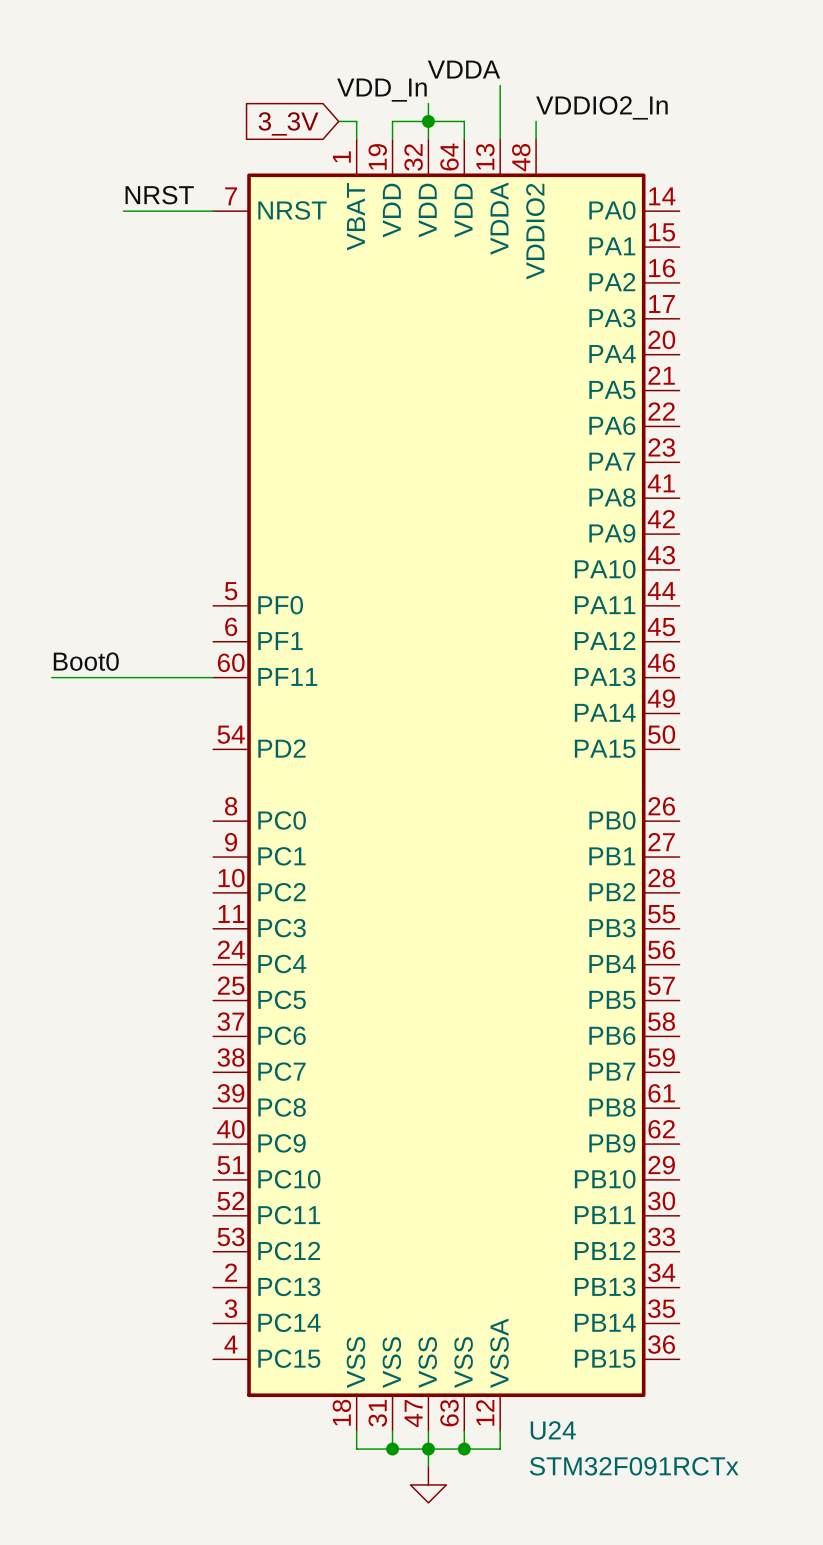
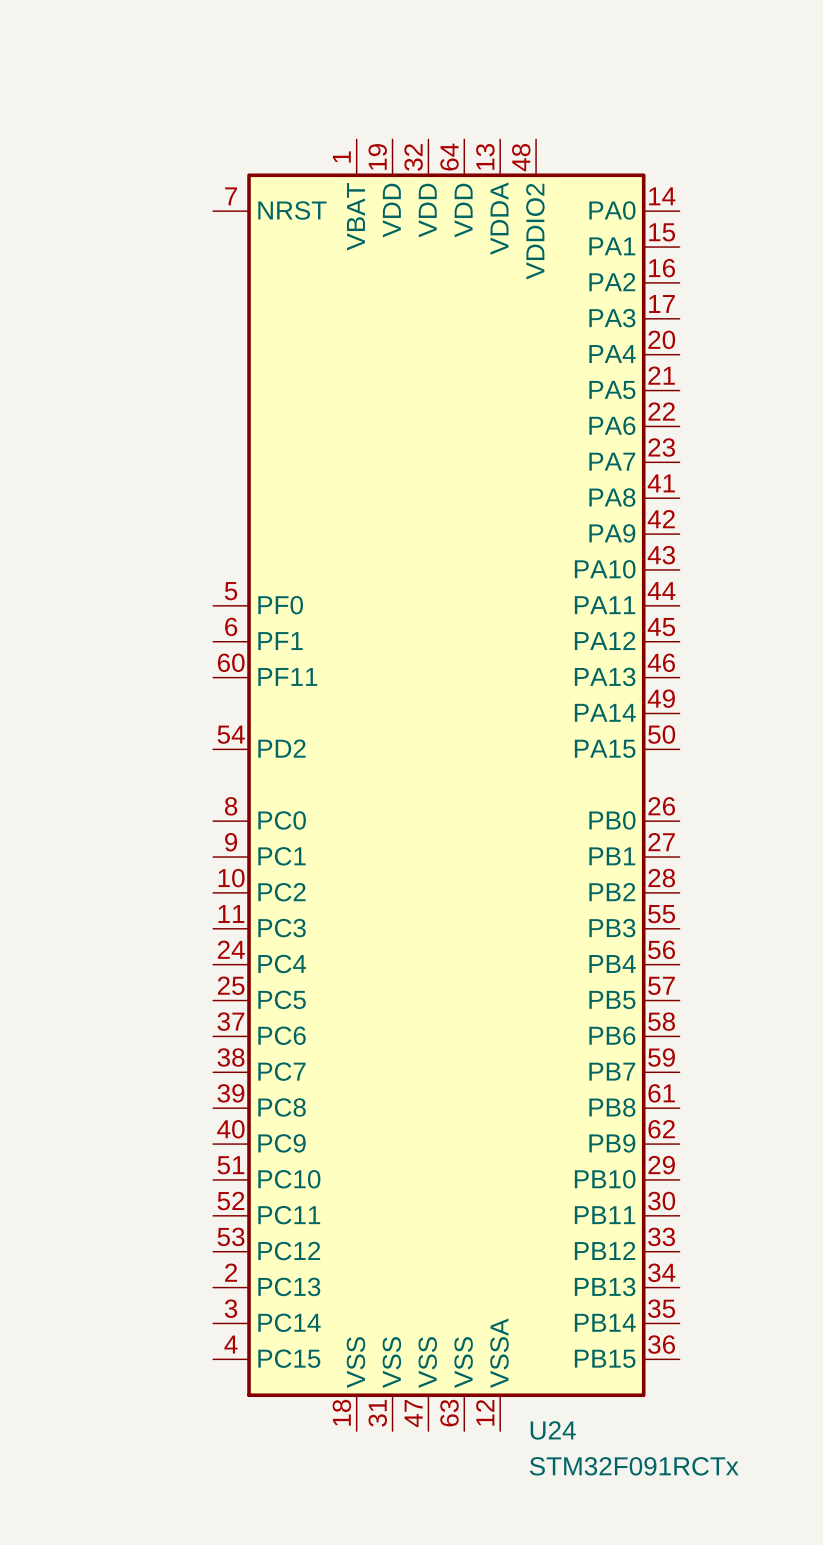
label: VDDA (463, 69) -> none
wire: (500, 85) (500, 139) -> none
label: VDD_In (381, 90) -> none
wire: (428, 103) (428, 139) -> none
label: VDDIO2_In (601, 107) -> none
wire: (338, 121) (356, 121) (356, 139) -> none
junction: (428, 121) -> none
wire: (536, 121) (536, 139) -> none
global label: 3_3V (288, 123) -> none
wire: (392, 139) (392, 121) (464, 121) (464, 139) -> none
label: NRST (159, 195) -> none
wire: (123, 211) (213, 211) -> none
label: Boot0 (86, 661) -> none
wire: (51, 677) (213, 677) -> none
wire: (356, 1431) (356, 1449) (500, 1449) (500, 1431) -> none
wire: (392, 1431) (392, 1449) -> none
wire: (428, 1431) (428, 1466) -> none
wire: (464, 1431) (464, 1449) -> none
junction: (392, 1449) -> none
junction: (428, 1449) -> none
junction: (464, 1449) -> none
power symbol: (428, 1484) -> none

